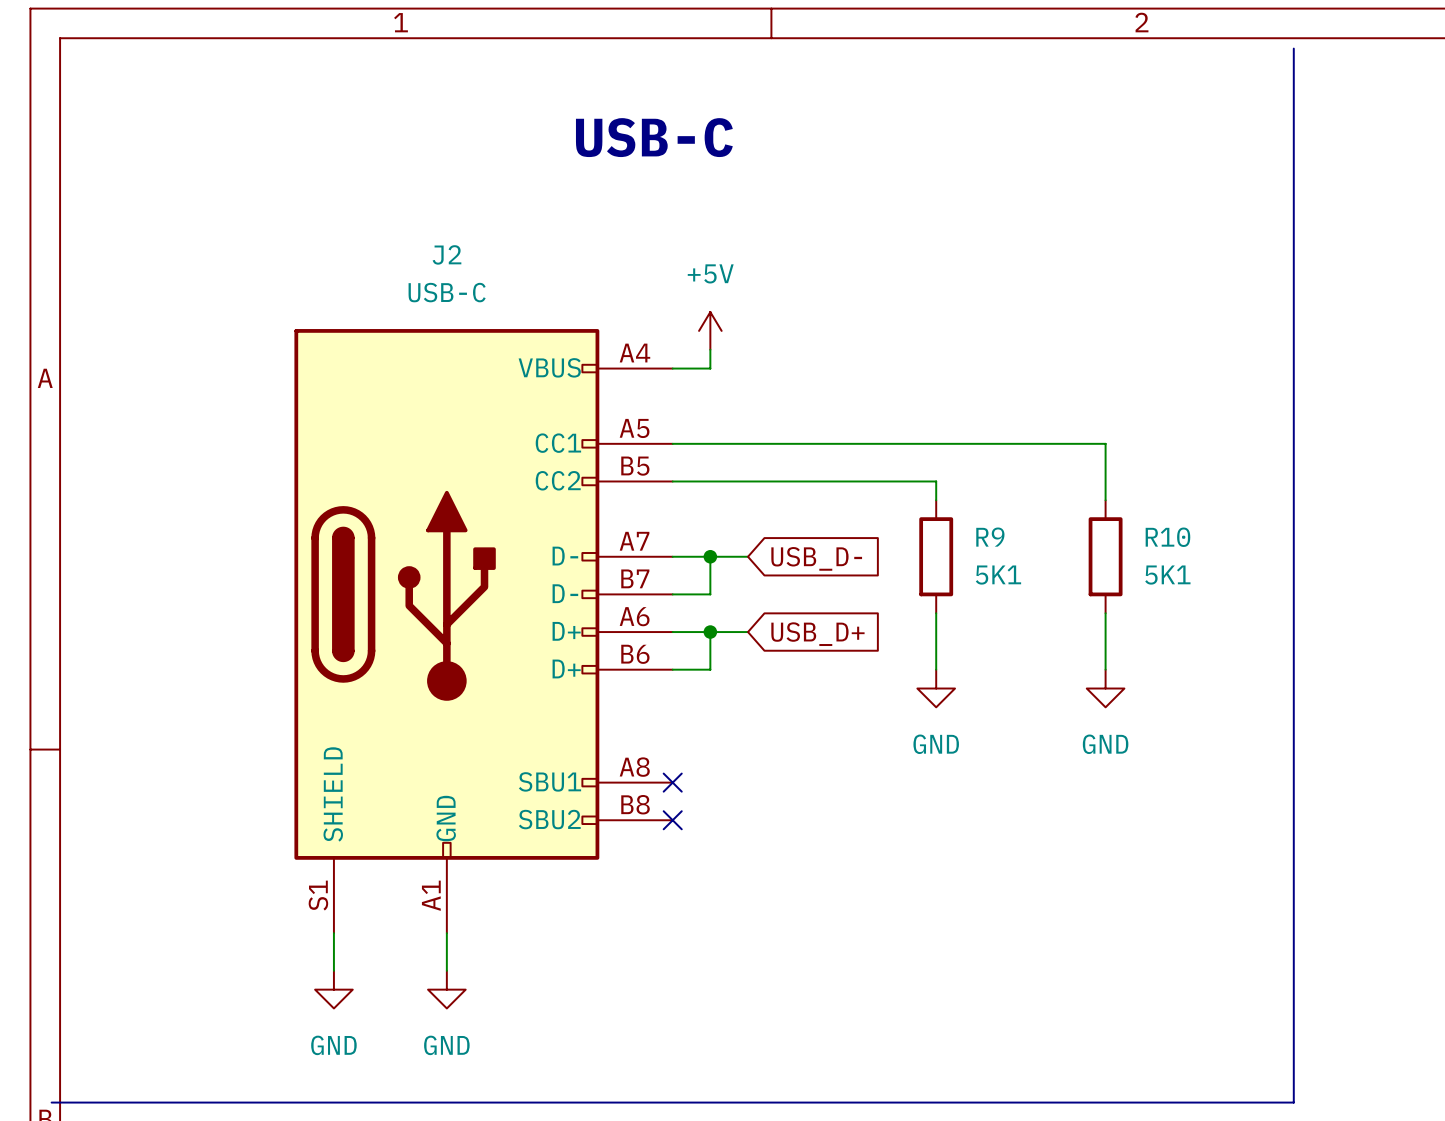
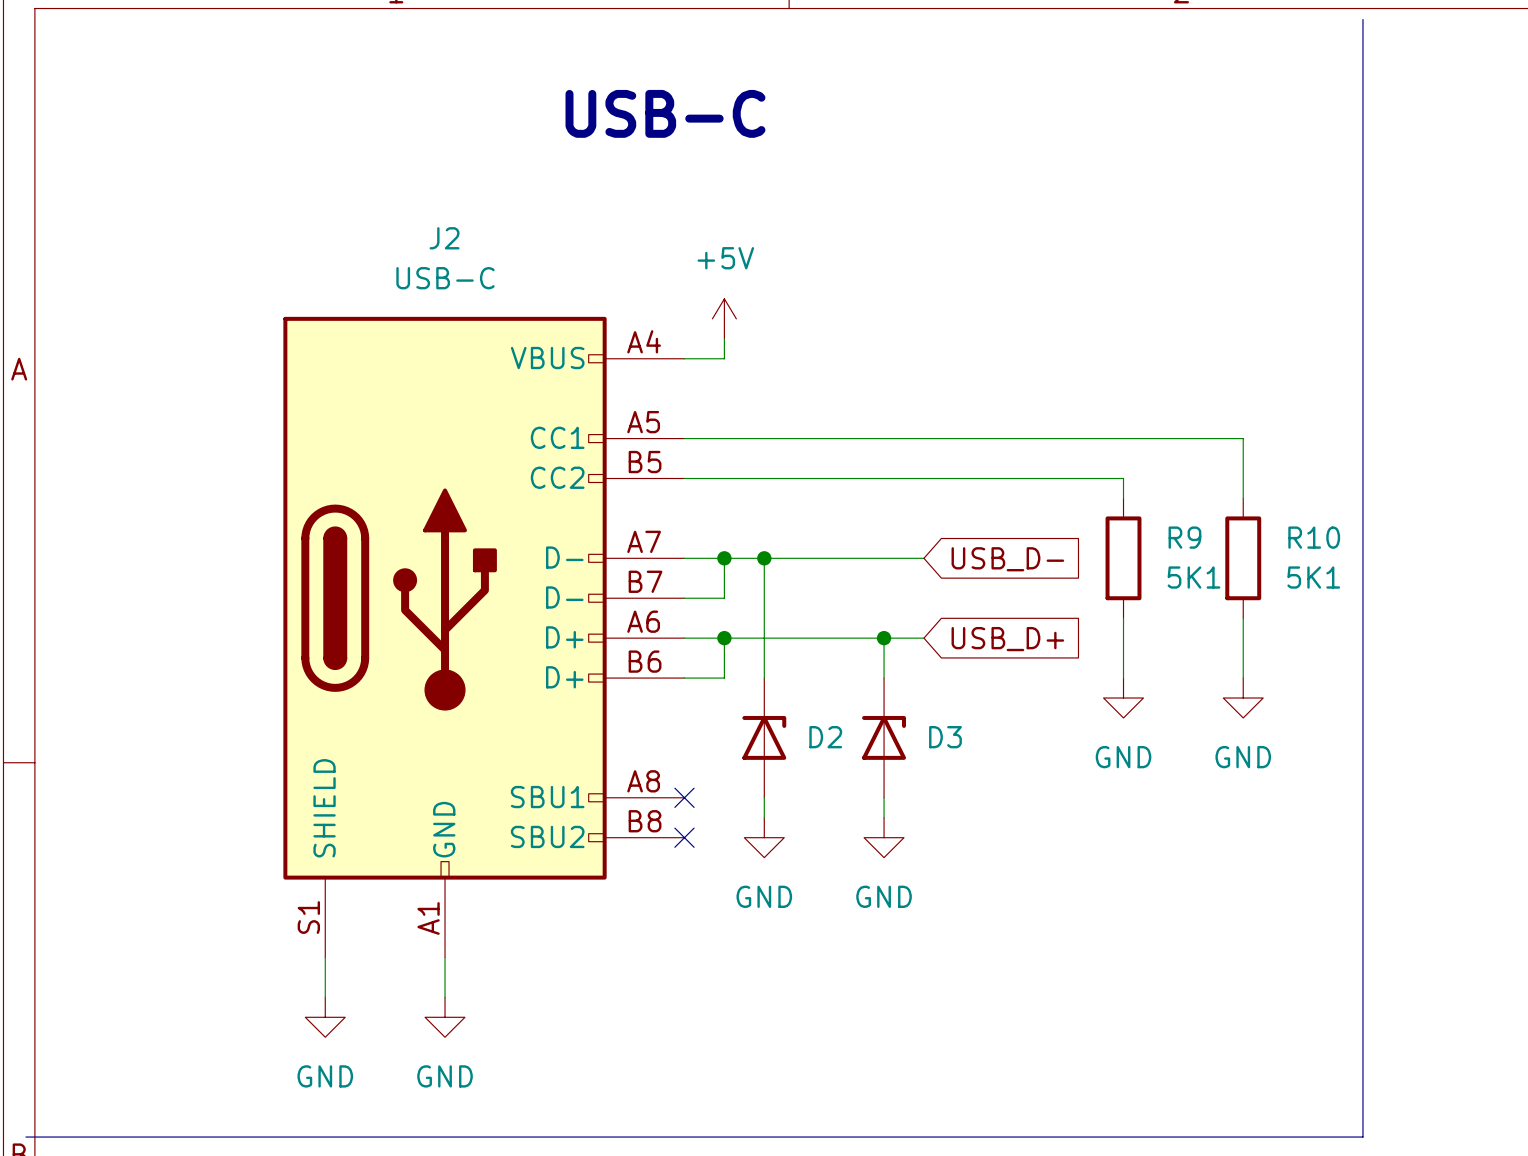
line: (1293, 48) (1293, 1102) -> (1362, 19) (1362, 1137) (1343, 1137)
wire: (1105, 443) (1105, 500) -> (1143, 438) (1243, 438) (1243, 498)
wire: (936, 481) (936, 500) -> (963, 478) (1123, 478) (1123, 498)
junction: none -> (764, 558)
wire: none -> (923, 558) (764, 558) (764, 678)
R9 position: (936, 556) -> (1123, 558)
R10 position: (1105, 556) -> (1243, 558)
global label position: USB_D- (816, 558) -> USB_D- (1007, 559)
wire: (936, 613) (936, 669) -> (1243, 618) (1243, 678)
wire: (1105, 613) (1105, 669) -> (1123, 618) (1123, 678)
wire: none -> (764, 638) (923, 638)
wire: none -> (884, 638) (884, 678)
junction: none -> (884, 638)
global label position: USB_D+ (817, 634) -> USB_D+ (1007, 639)
power symbol: GND (936, 688) -> none
power symbol position: GND (1105, 688) -> GND (1123, 698)
power symbol: none -> GND (1243, 698)
D2: none -> (764, 737)
D3: none -> (884, 737)
wire: none -> (764, 797) (764, 817)
wire: none -> (884, 797) (884, 817)
power symbol: none -> GND (764, 837)
power symbol: none -> GND (884, 837)

